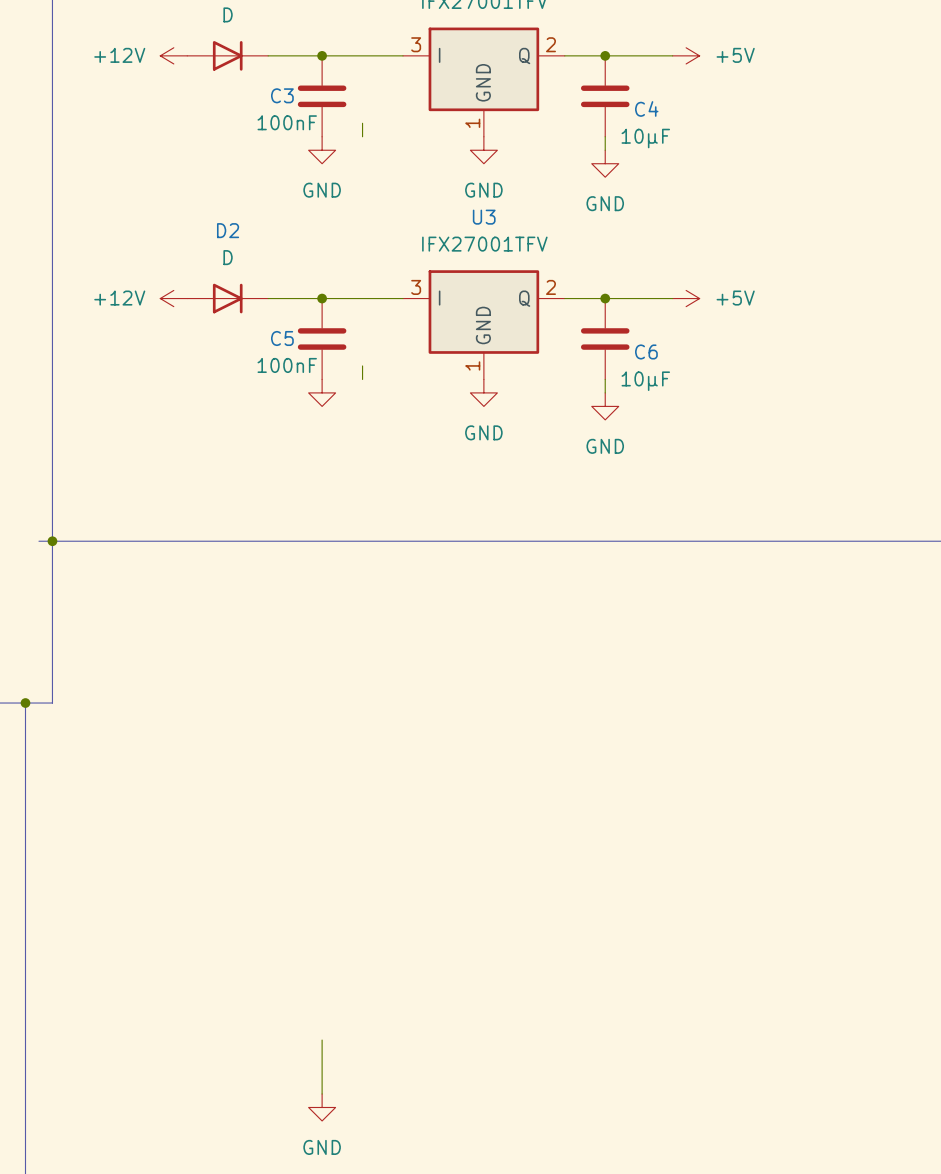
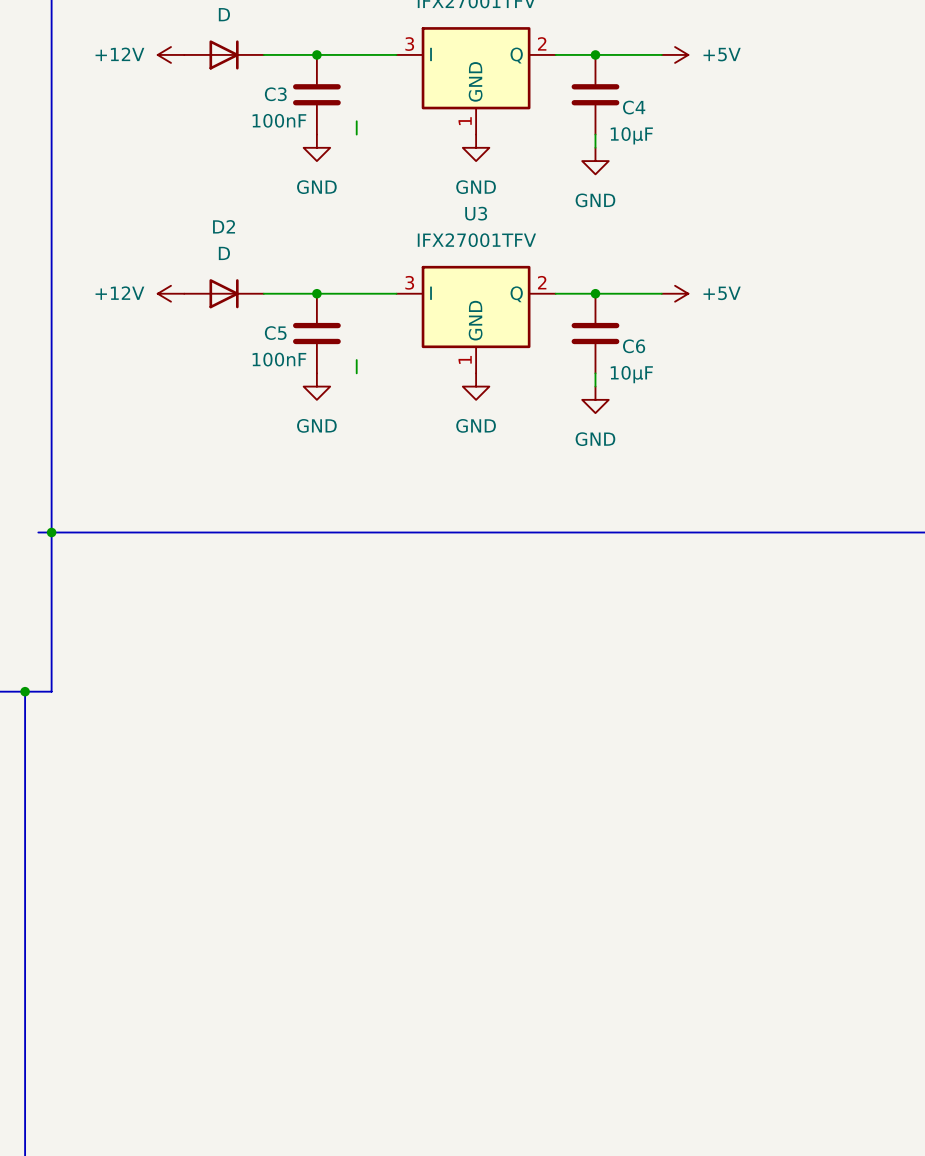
power symbol text: none -> GND (316, 425)
wire: (322, 1040) (322, 1094) -> none
power symbol: GND (322, 1107) -> none

